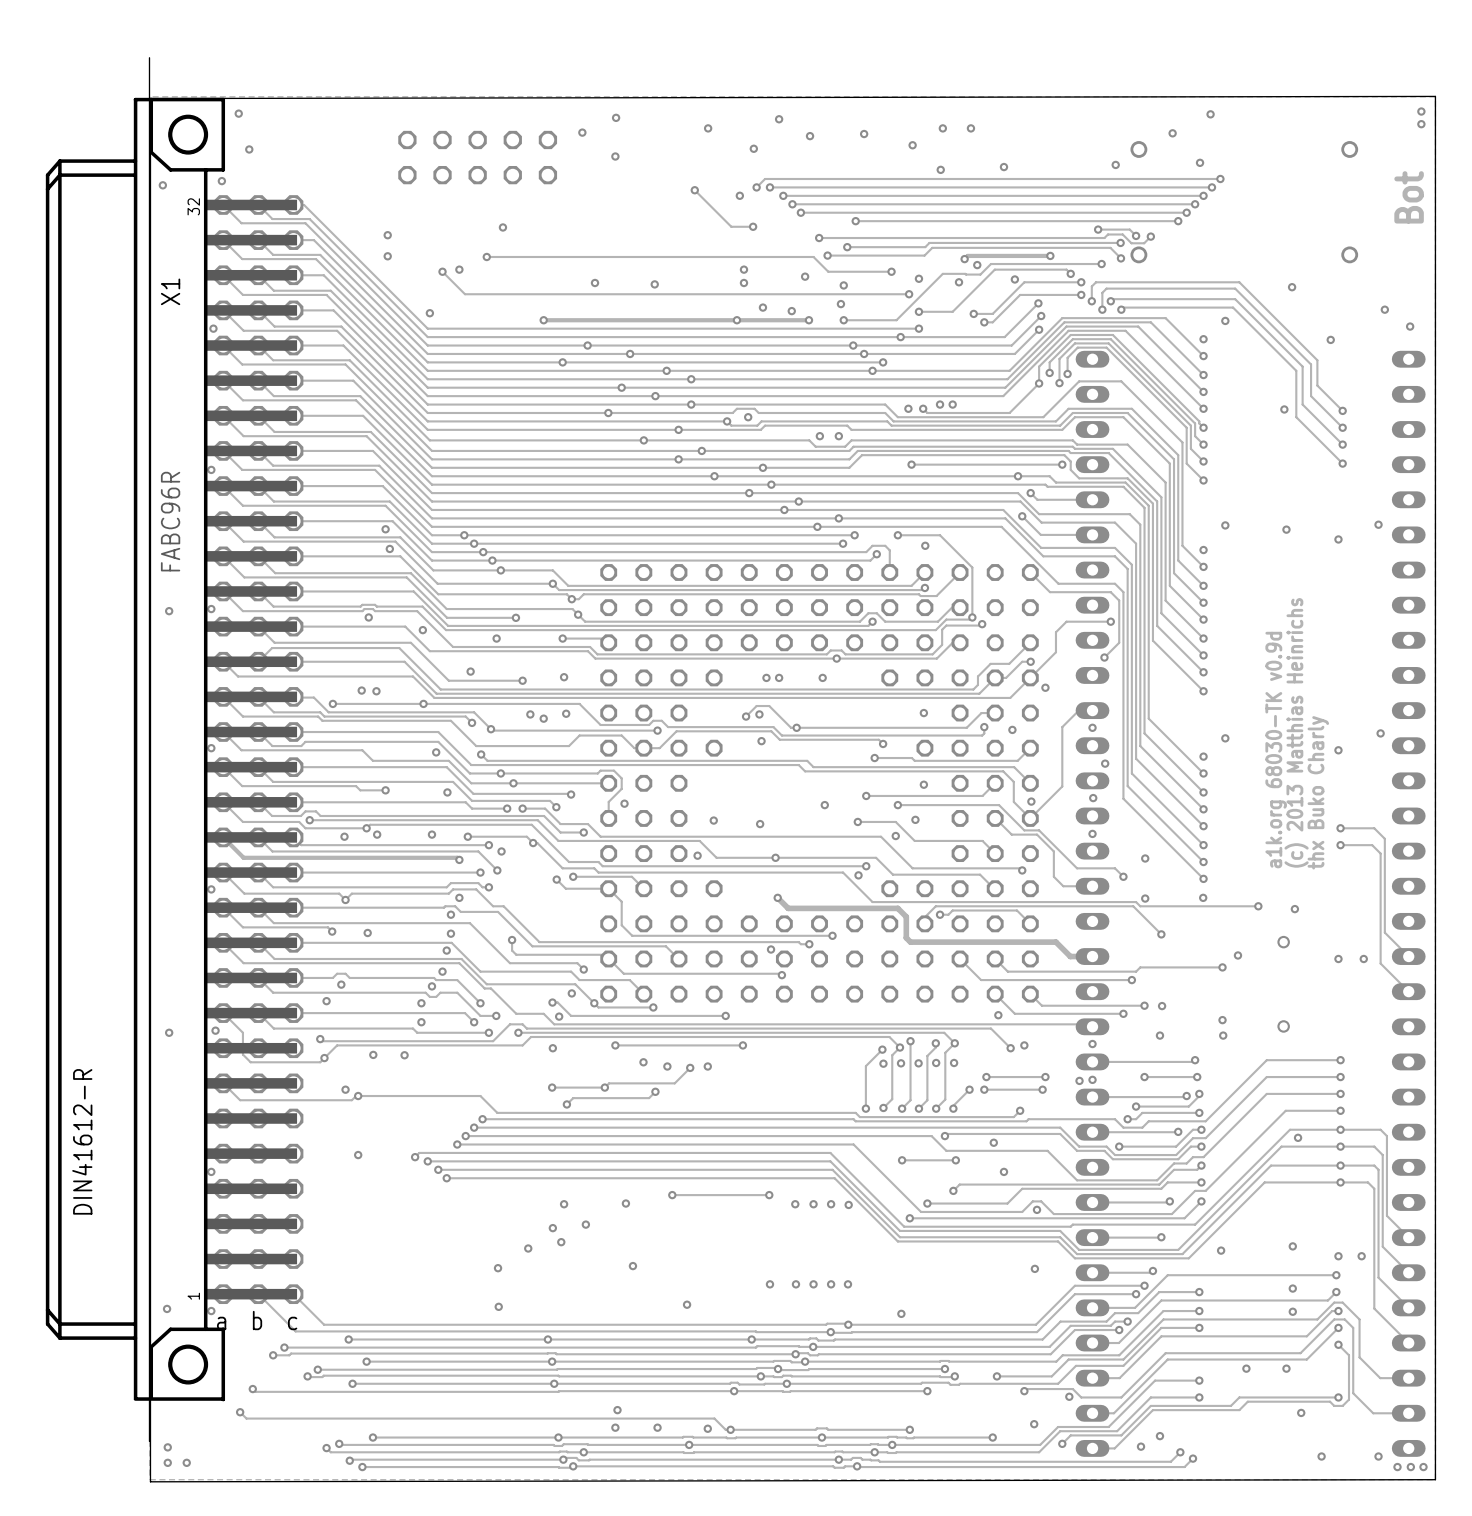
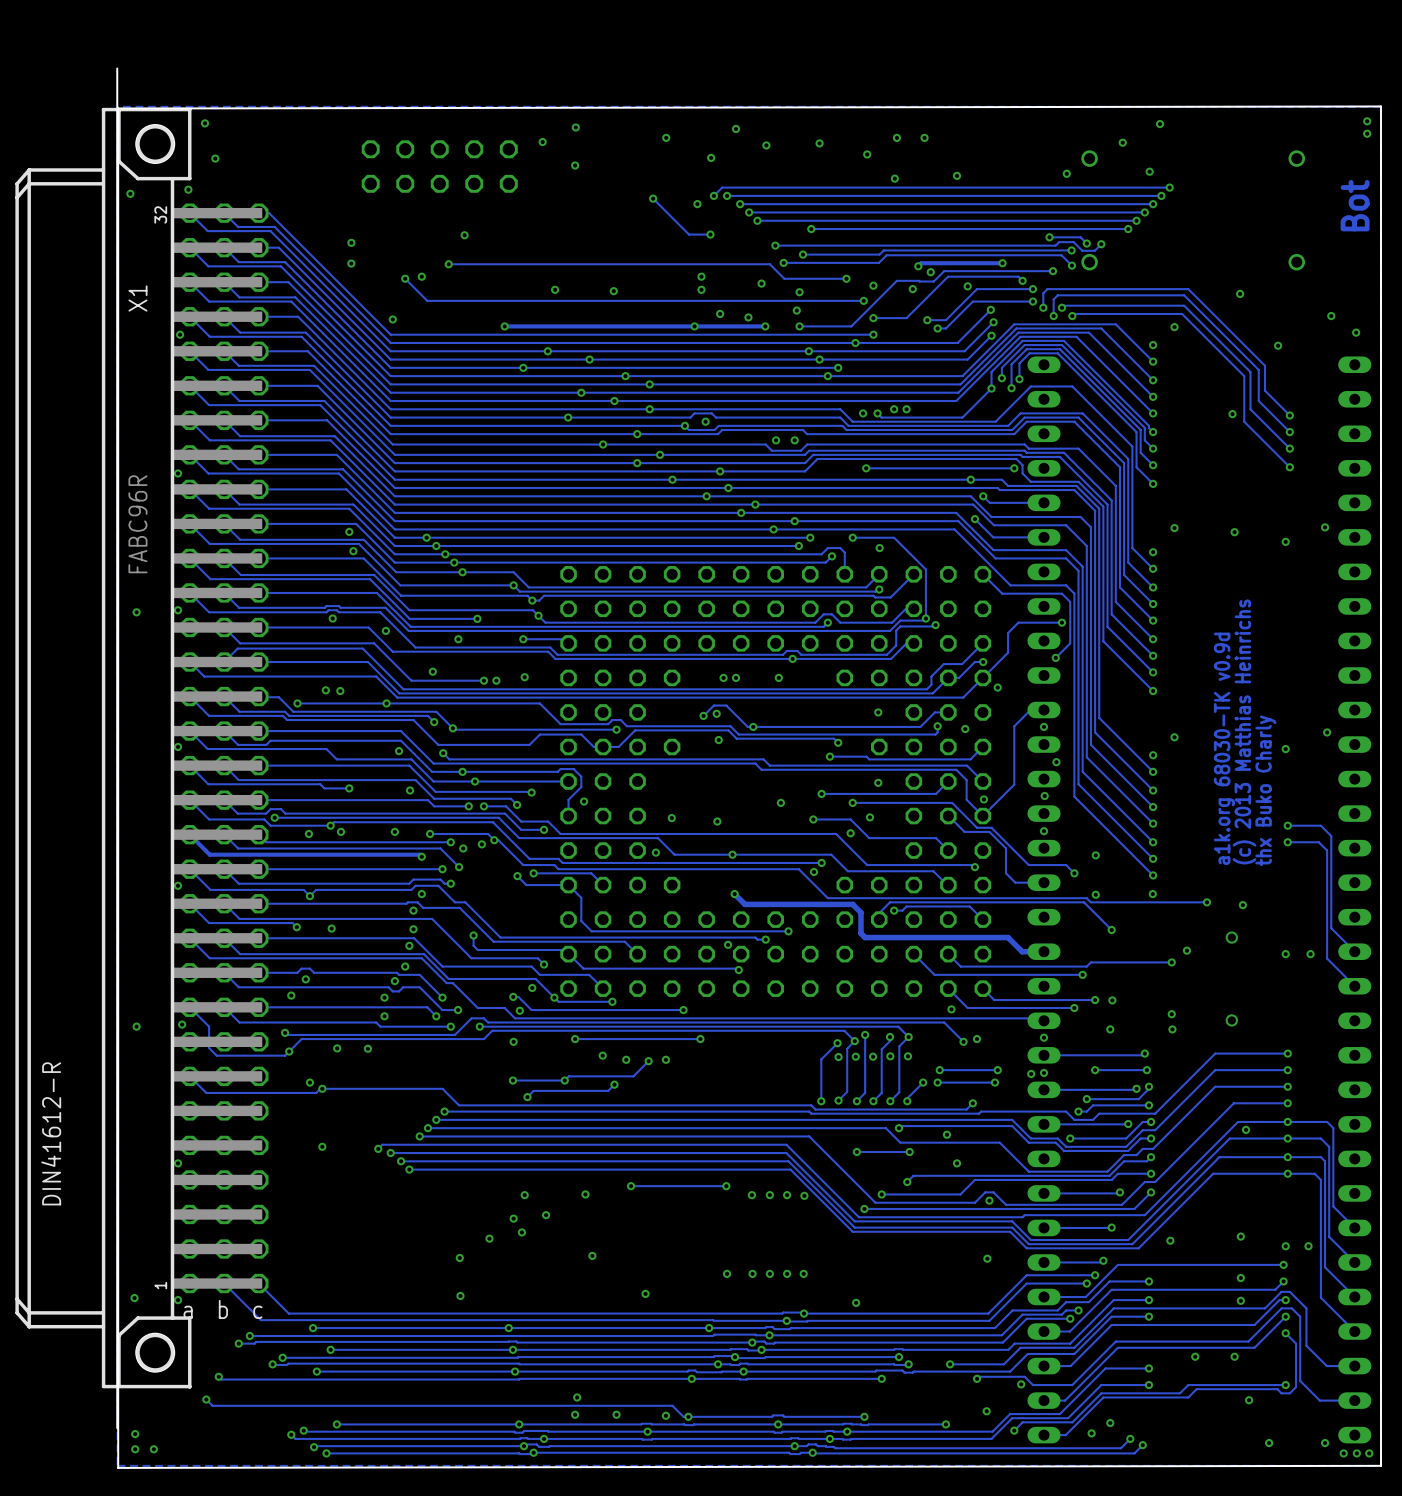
via: none -> (496, 680)
via: (566, 713) -> none
via: (530, 714) -> none
via: (543, 718) -> none
via: none -> (481, 844)

